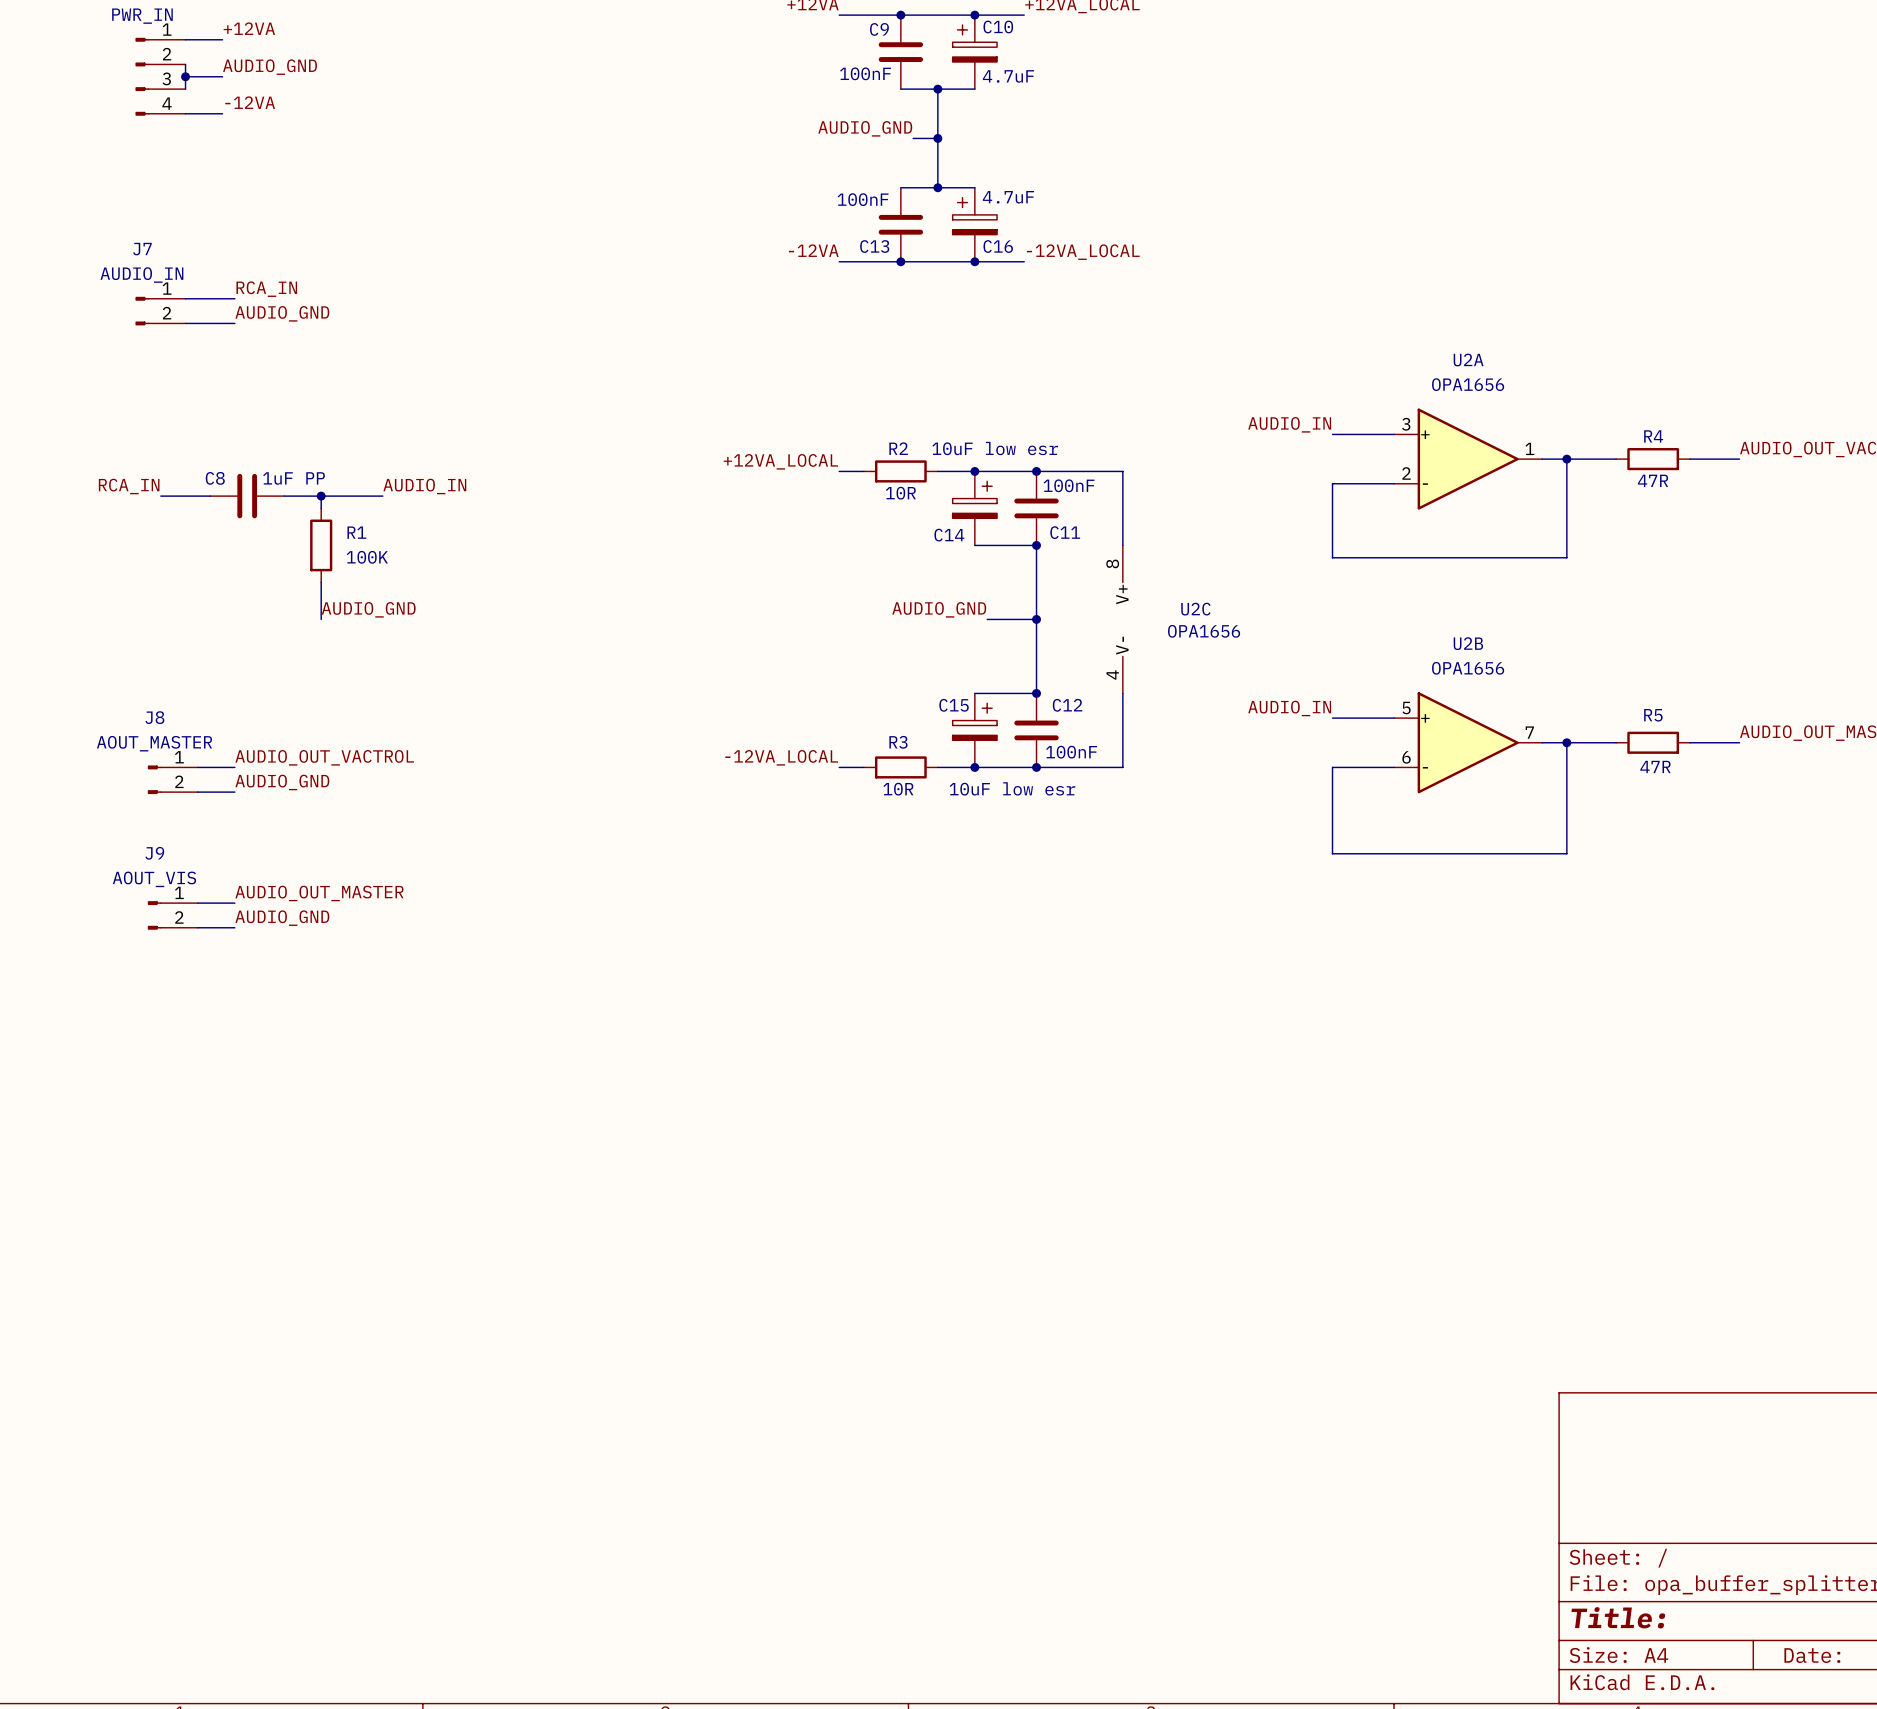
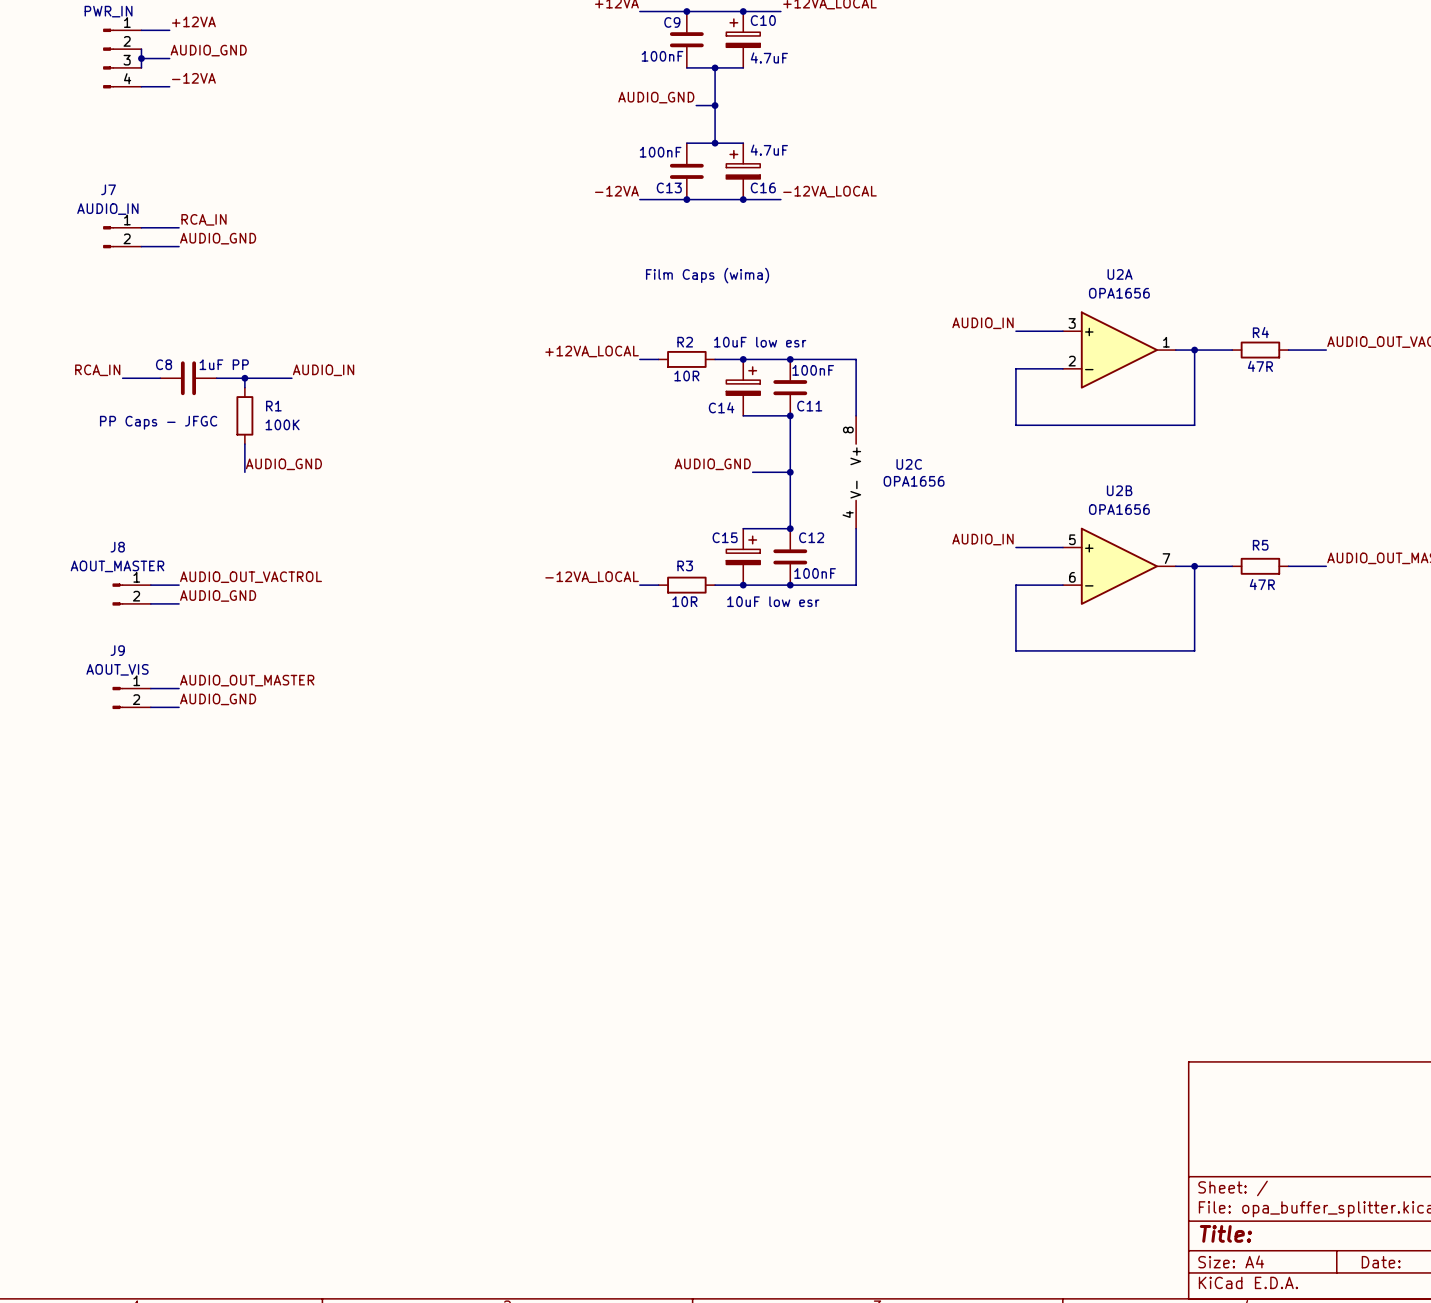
text: none -> Film Caps (wima) (707, 275)
text: none -> PP Caps - JFGC (158, 422)

